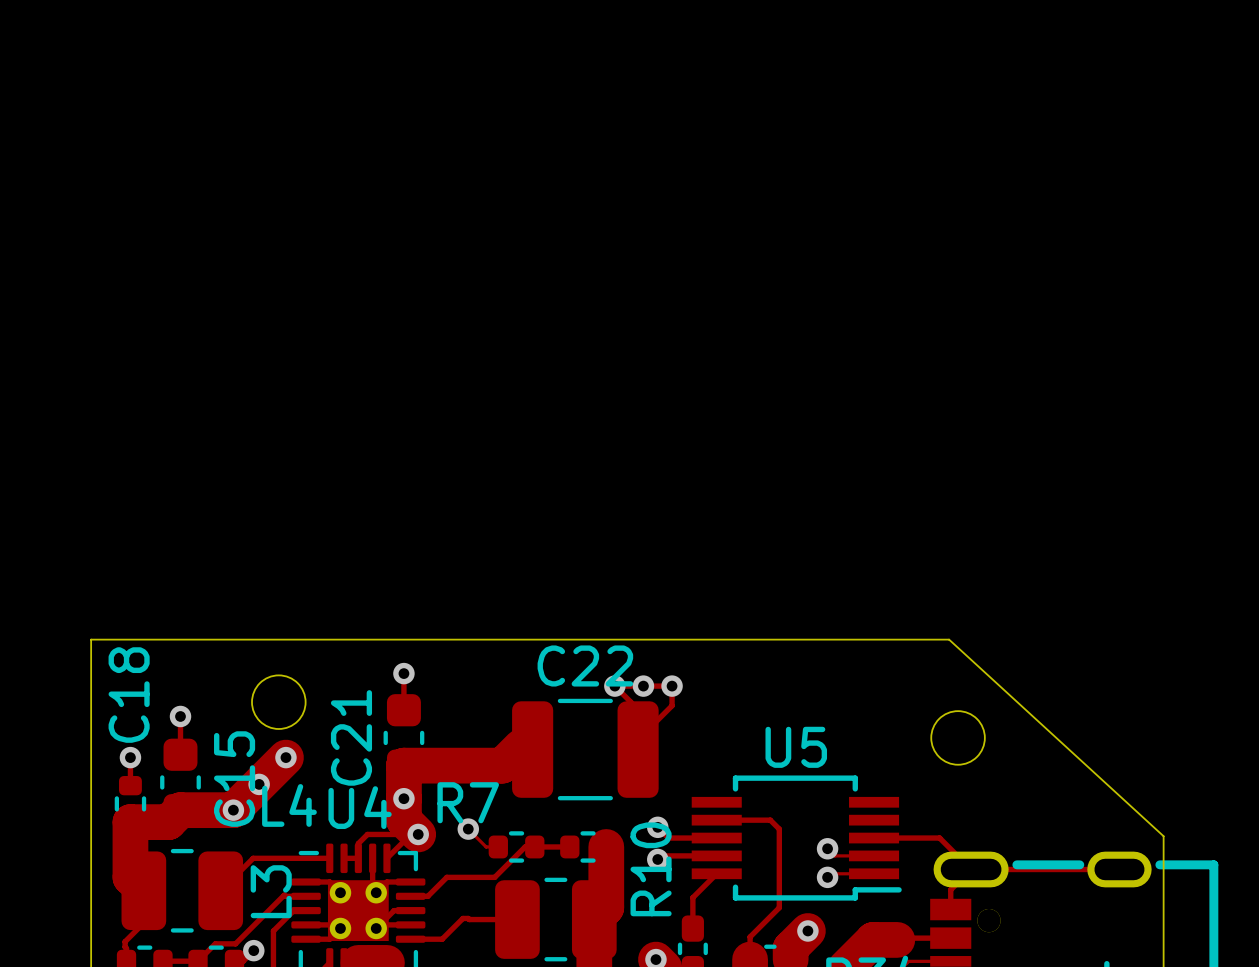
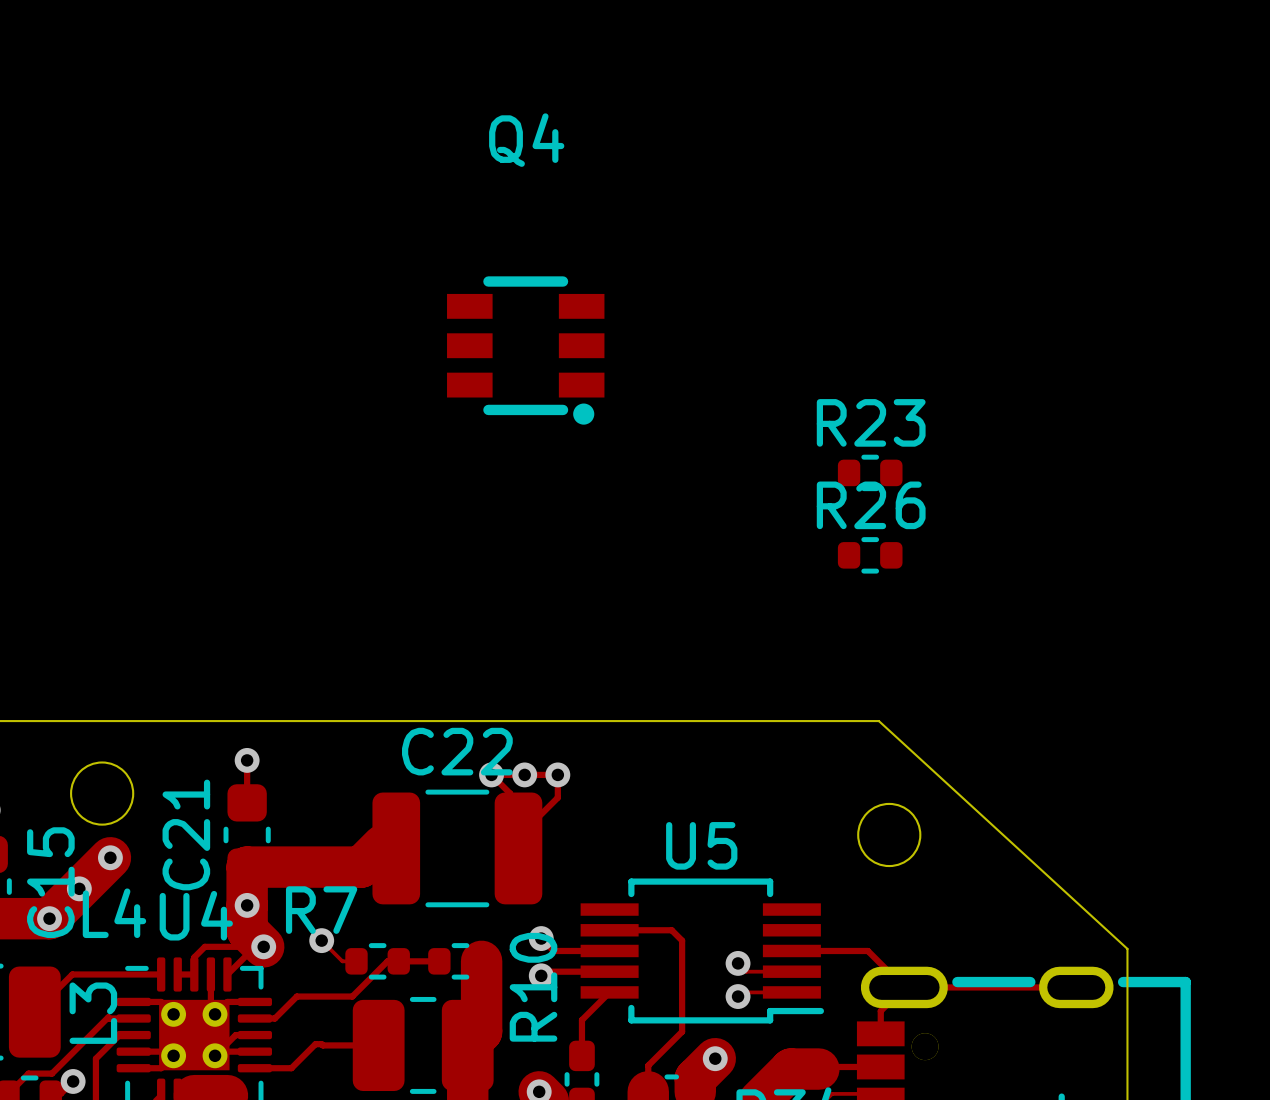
Q4: none -> (525, 350)
R23: none -> (870, 472)
R26: none -> (870, 555)

